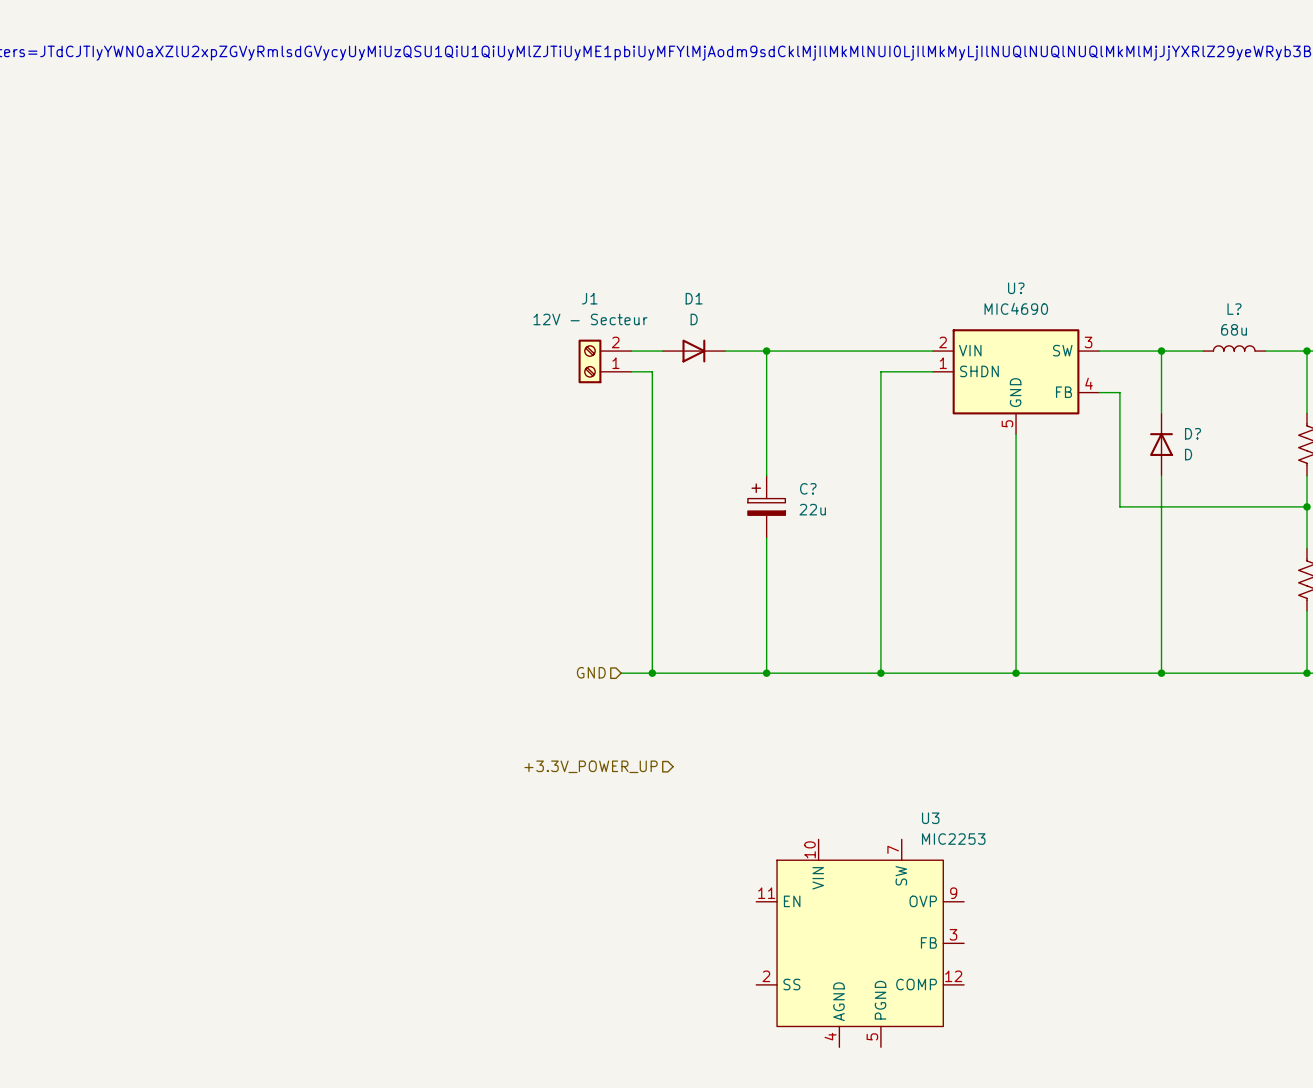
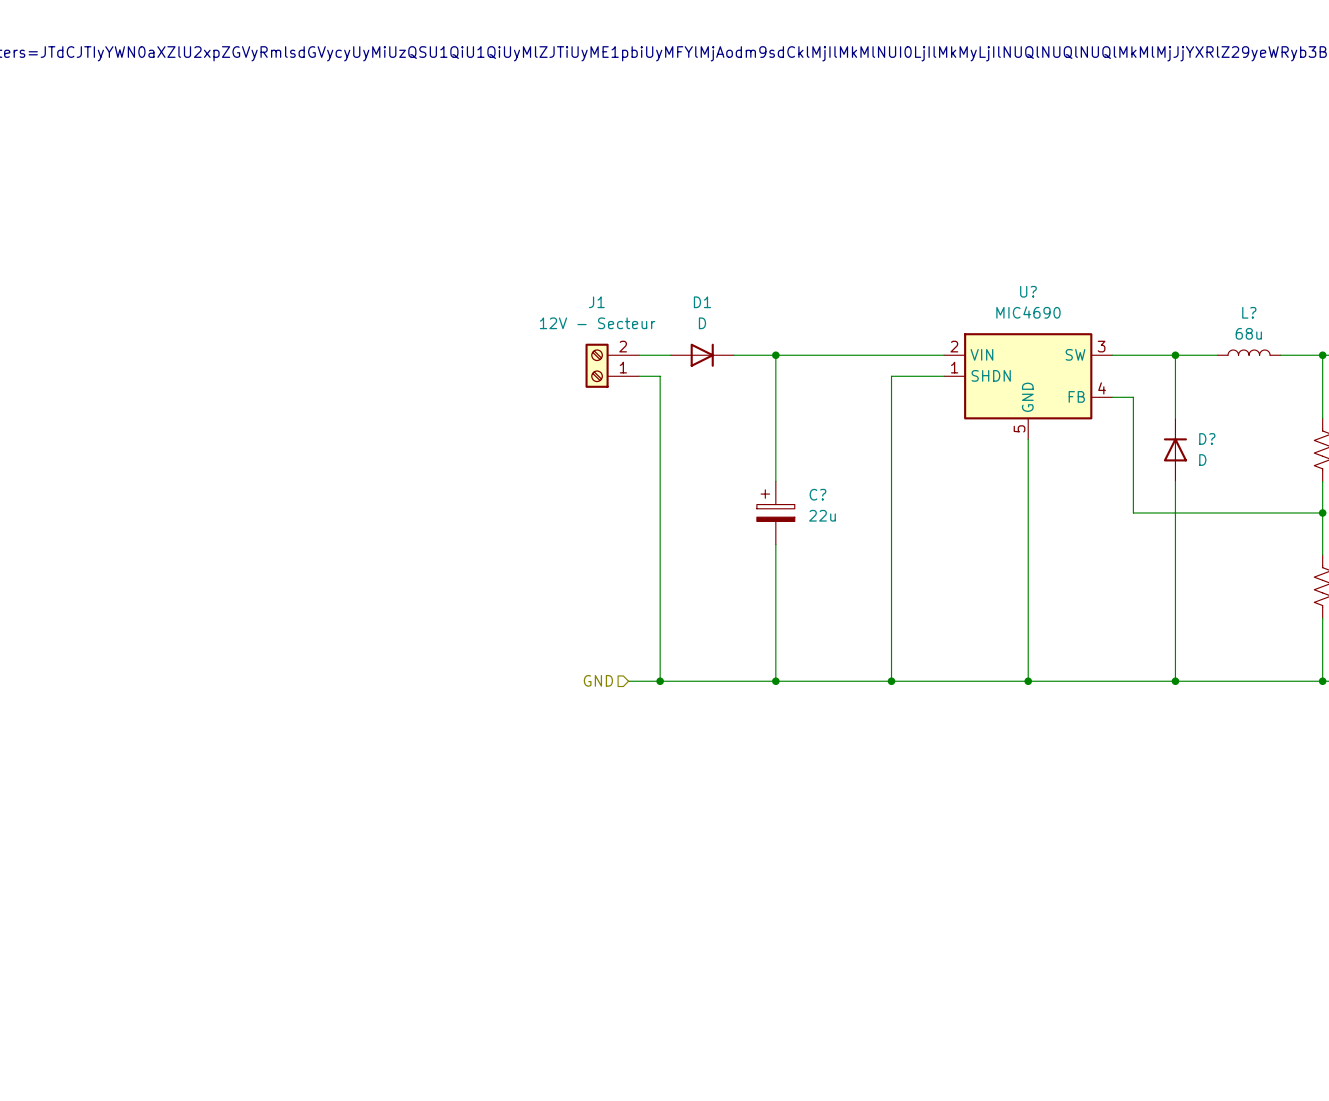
hierarchical label: +3.3V_POWER_UP (591, 766) -> none
U3: MIC2253 (860, 943) -> none

